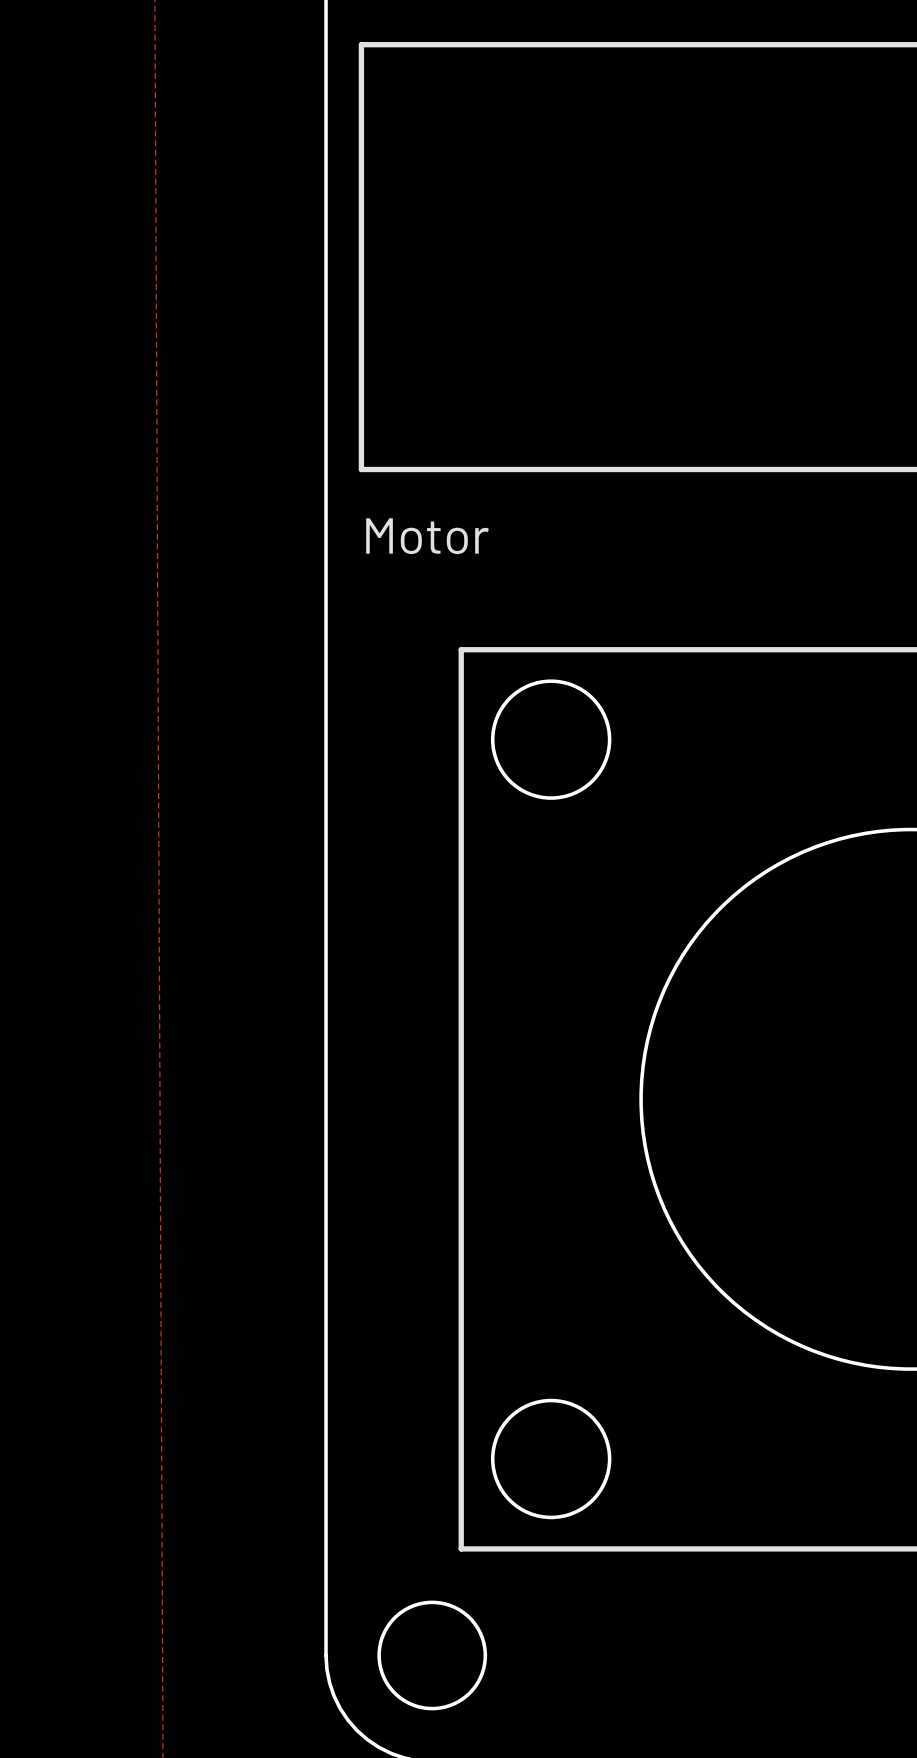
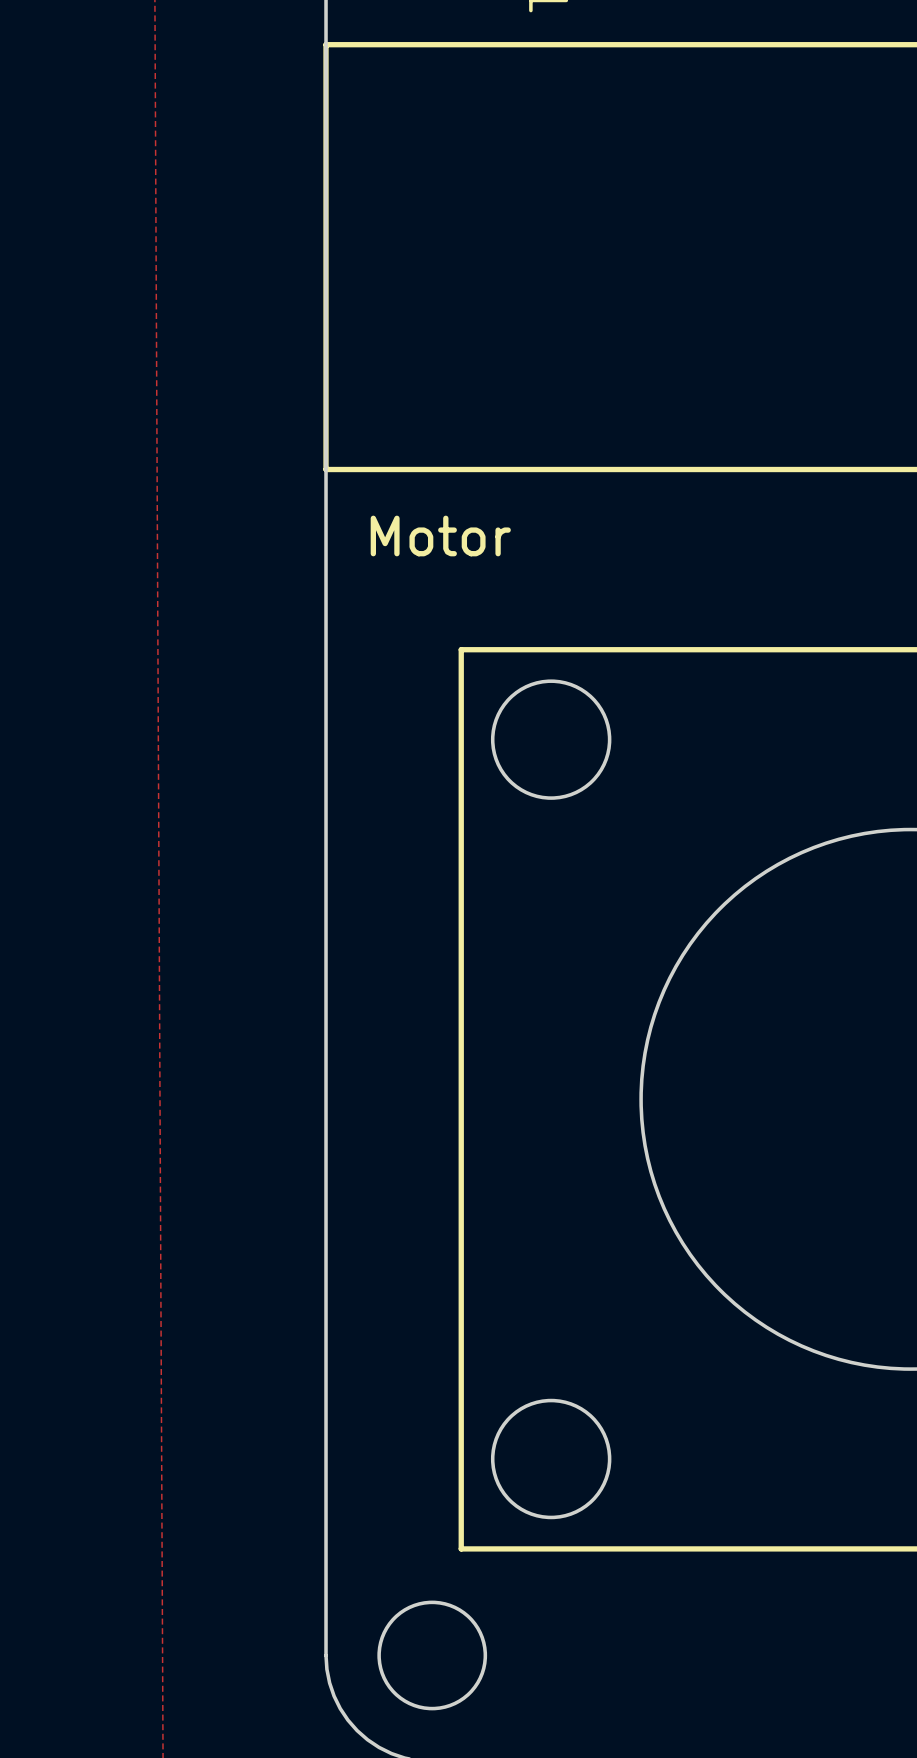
line: (361, 44) (361, 469) -> (361, 44) (326, 44) (326, 469) (361, 469)

